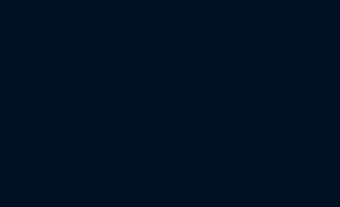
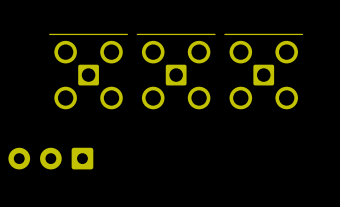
part: none -> (88, 71)
part: none -> (176, 71)
part: none -> (263, 71)
part: none -> (50, 158)

